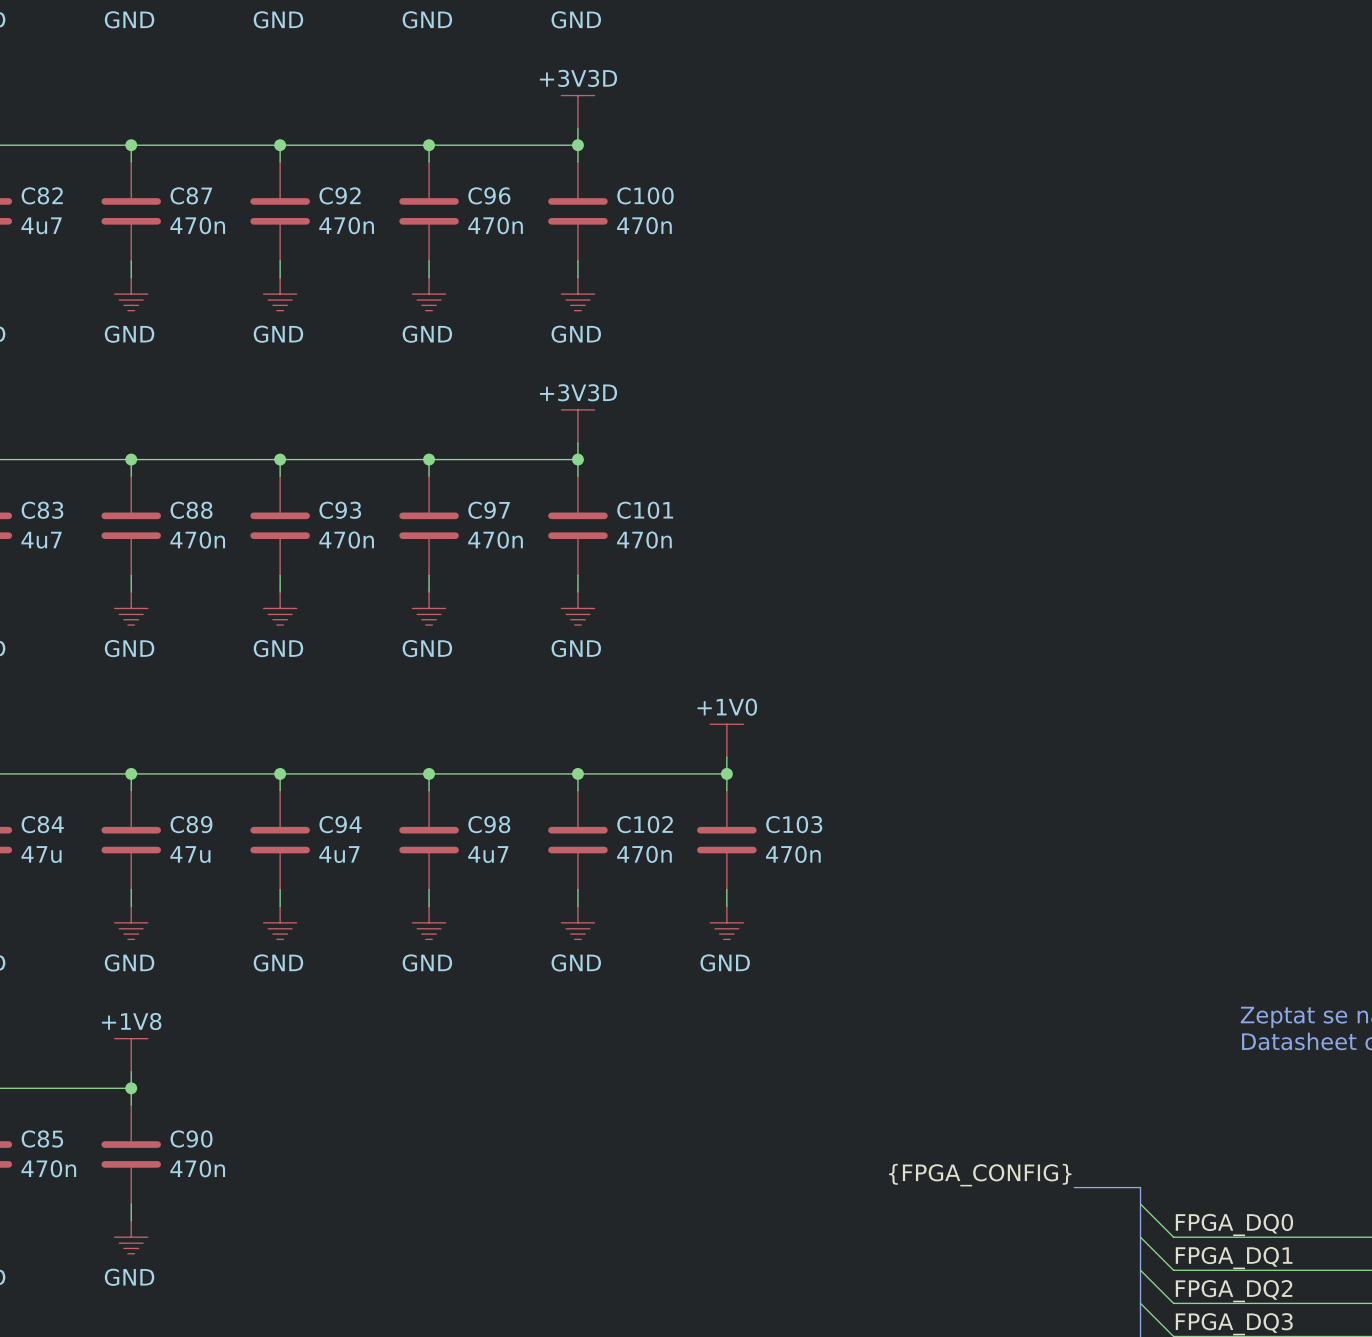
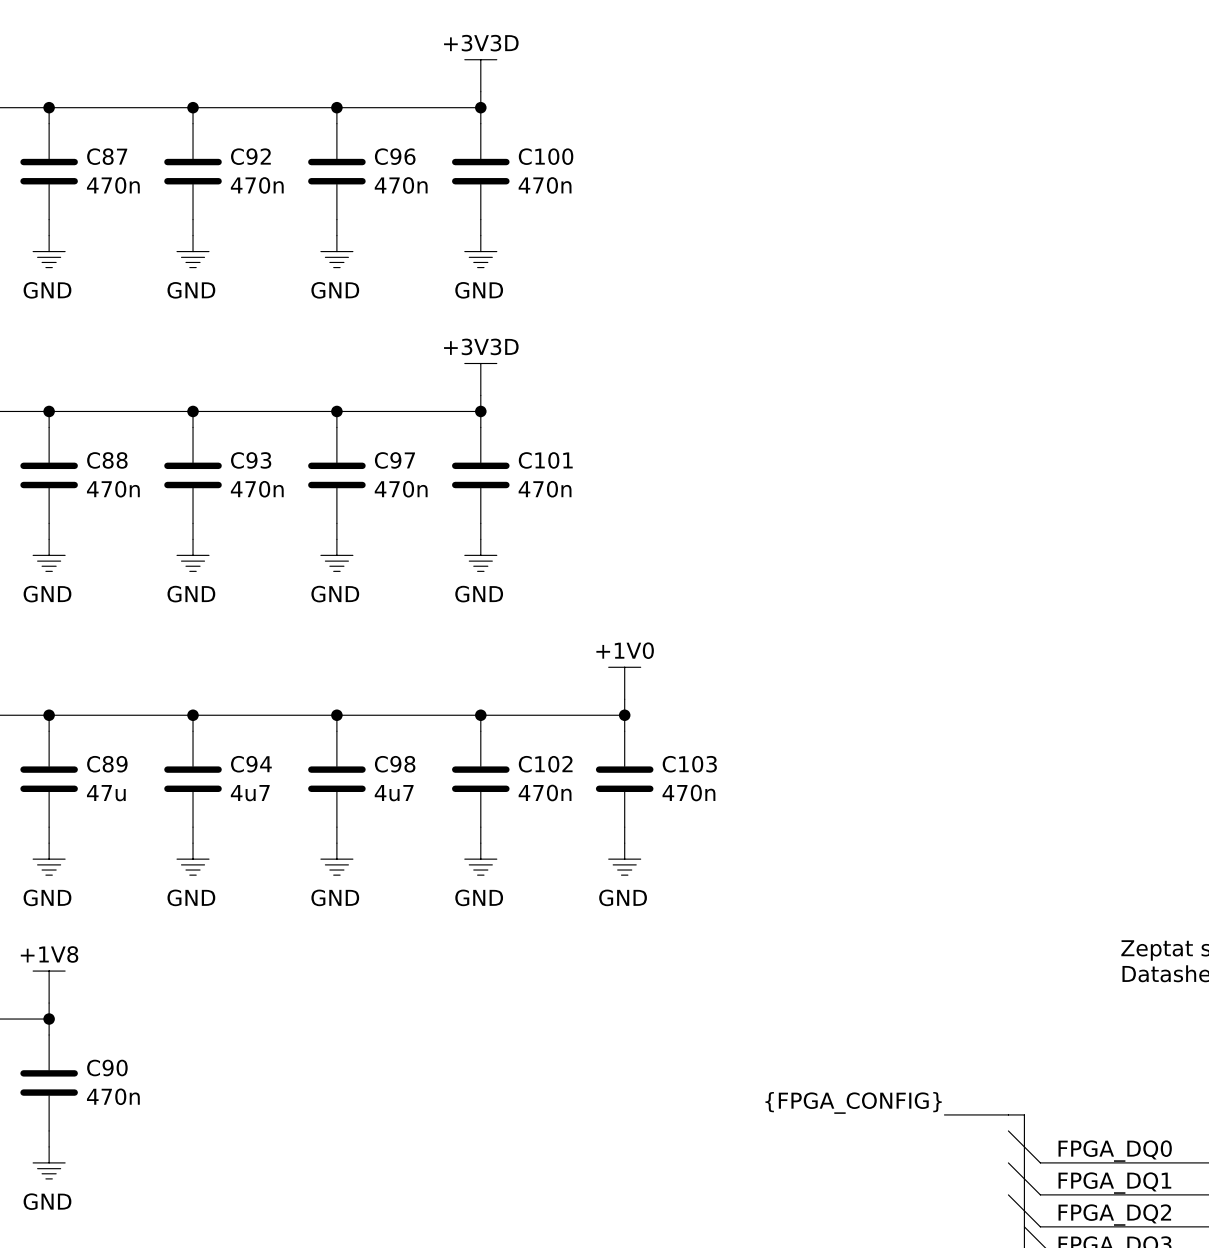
label position: {FPGA_CONFIG} (980, 1175) -> {FPGA_CONFIG} (853, 1102)
bus: none -> (944, 1114) (960, 1114)
wire: (1140, 1204) (1173, 1237) -> (1008, 1130) (1040, 1162) (1056, 1162)
wire: (1140, 1237) (1173, 1270) -> (1008, 1162) (1040, 1194) (1056, 1194)
wire: (1140, 1270) (1173, 1303) -> (1008, 1194) (1040, 1226) (1056, 1226)

